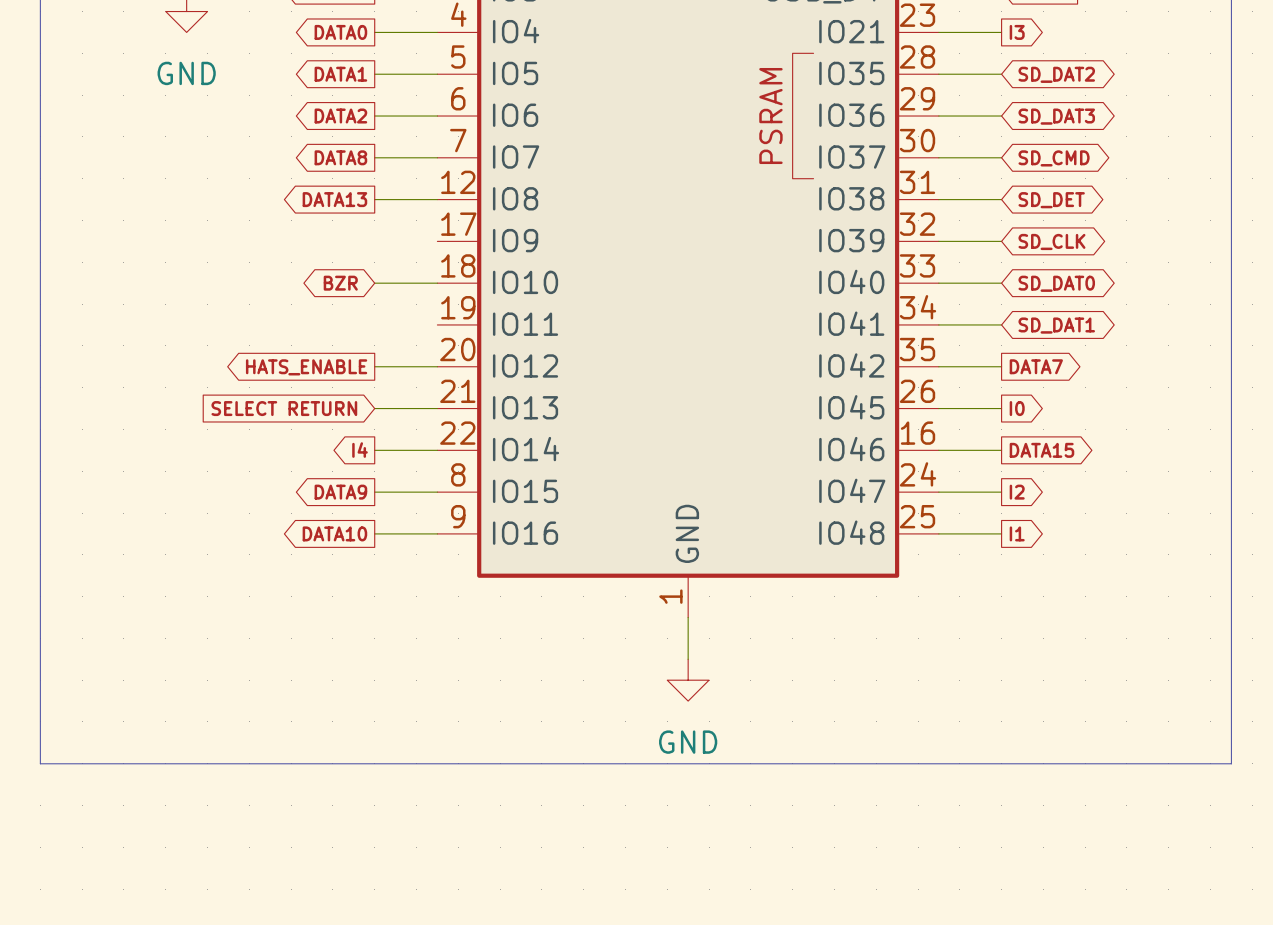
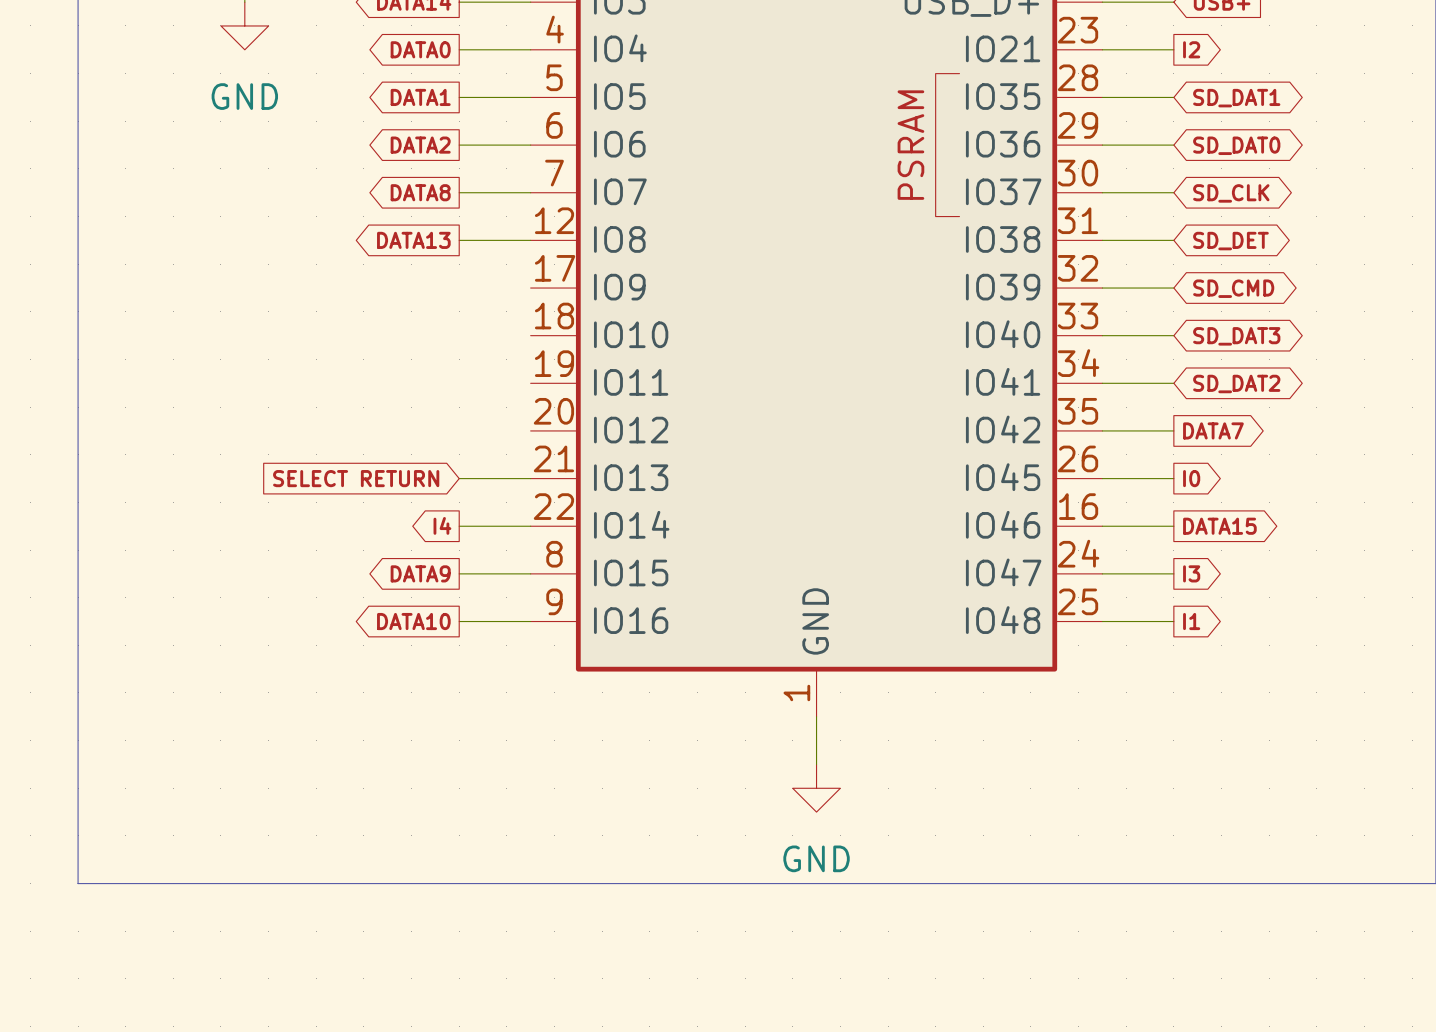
global label: I3 (1017, 32) -> I2 (1191, 49)
global label: SD_DAT2 (1056, 74) -> SD_DAT1 (1236, 98)
global label: SD_DAT3 (1056, 116) -> SD_DAT0 (1236, 145)
global label: SD_CMD (1054, 158) -> SD_CLK (1231, 193)
global label: SD_CLK (1051, 241) -> SD_CMD (1233, 288)
global label: BZR (340, 283) -> none
wire: (374, 283) (437, 283) -> none
global label: SD_DAT0 (1056, 283) -> SD_DAT3 (1236, 336)
global label: SD_DAT1 (1056, 325) -> SD_DAT2 (1236, 383)
wire: (374, 366) (437, 366) -> none
global label: HATS_ENABLE (306, 367) -> none
global label: I2 (1017, 492) -> I3 (1191, 573)

